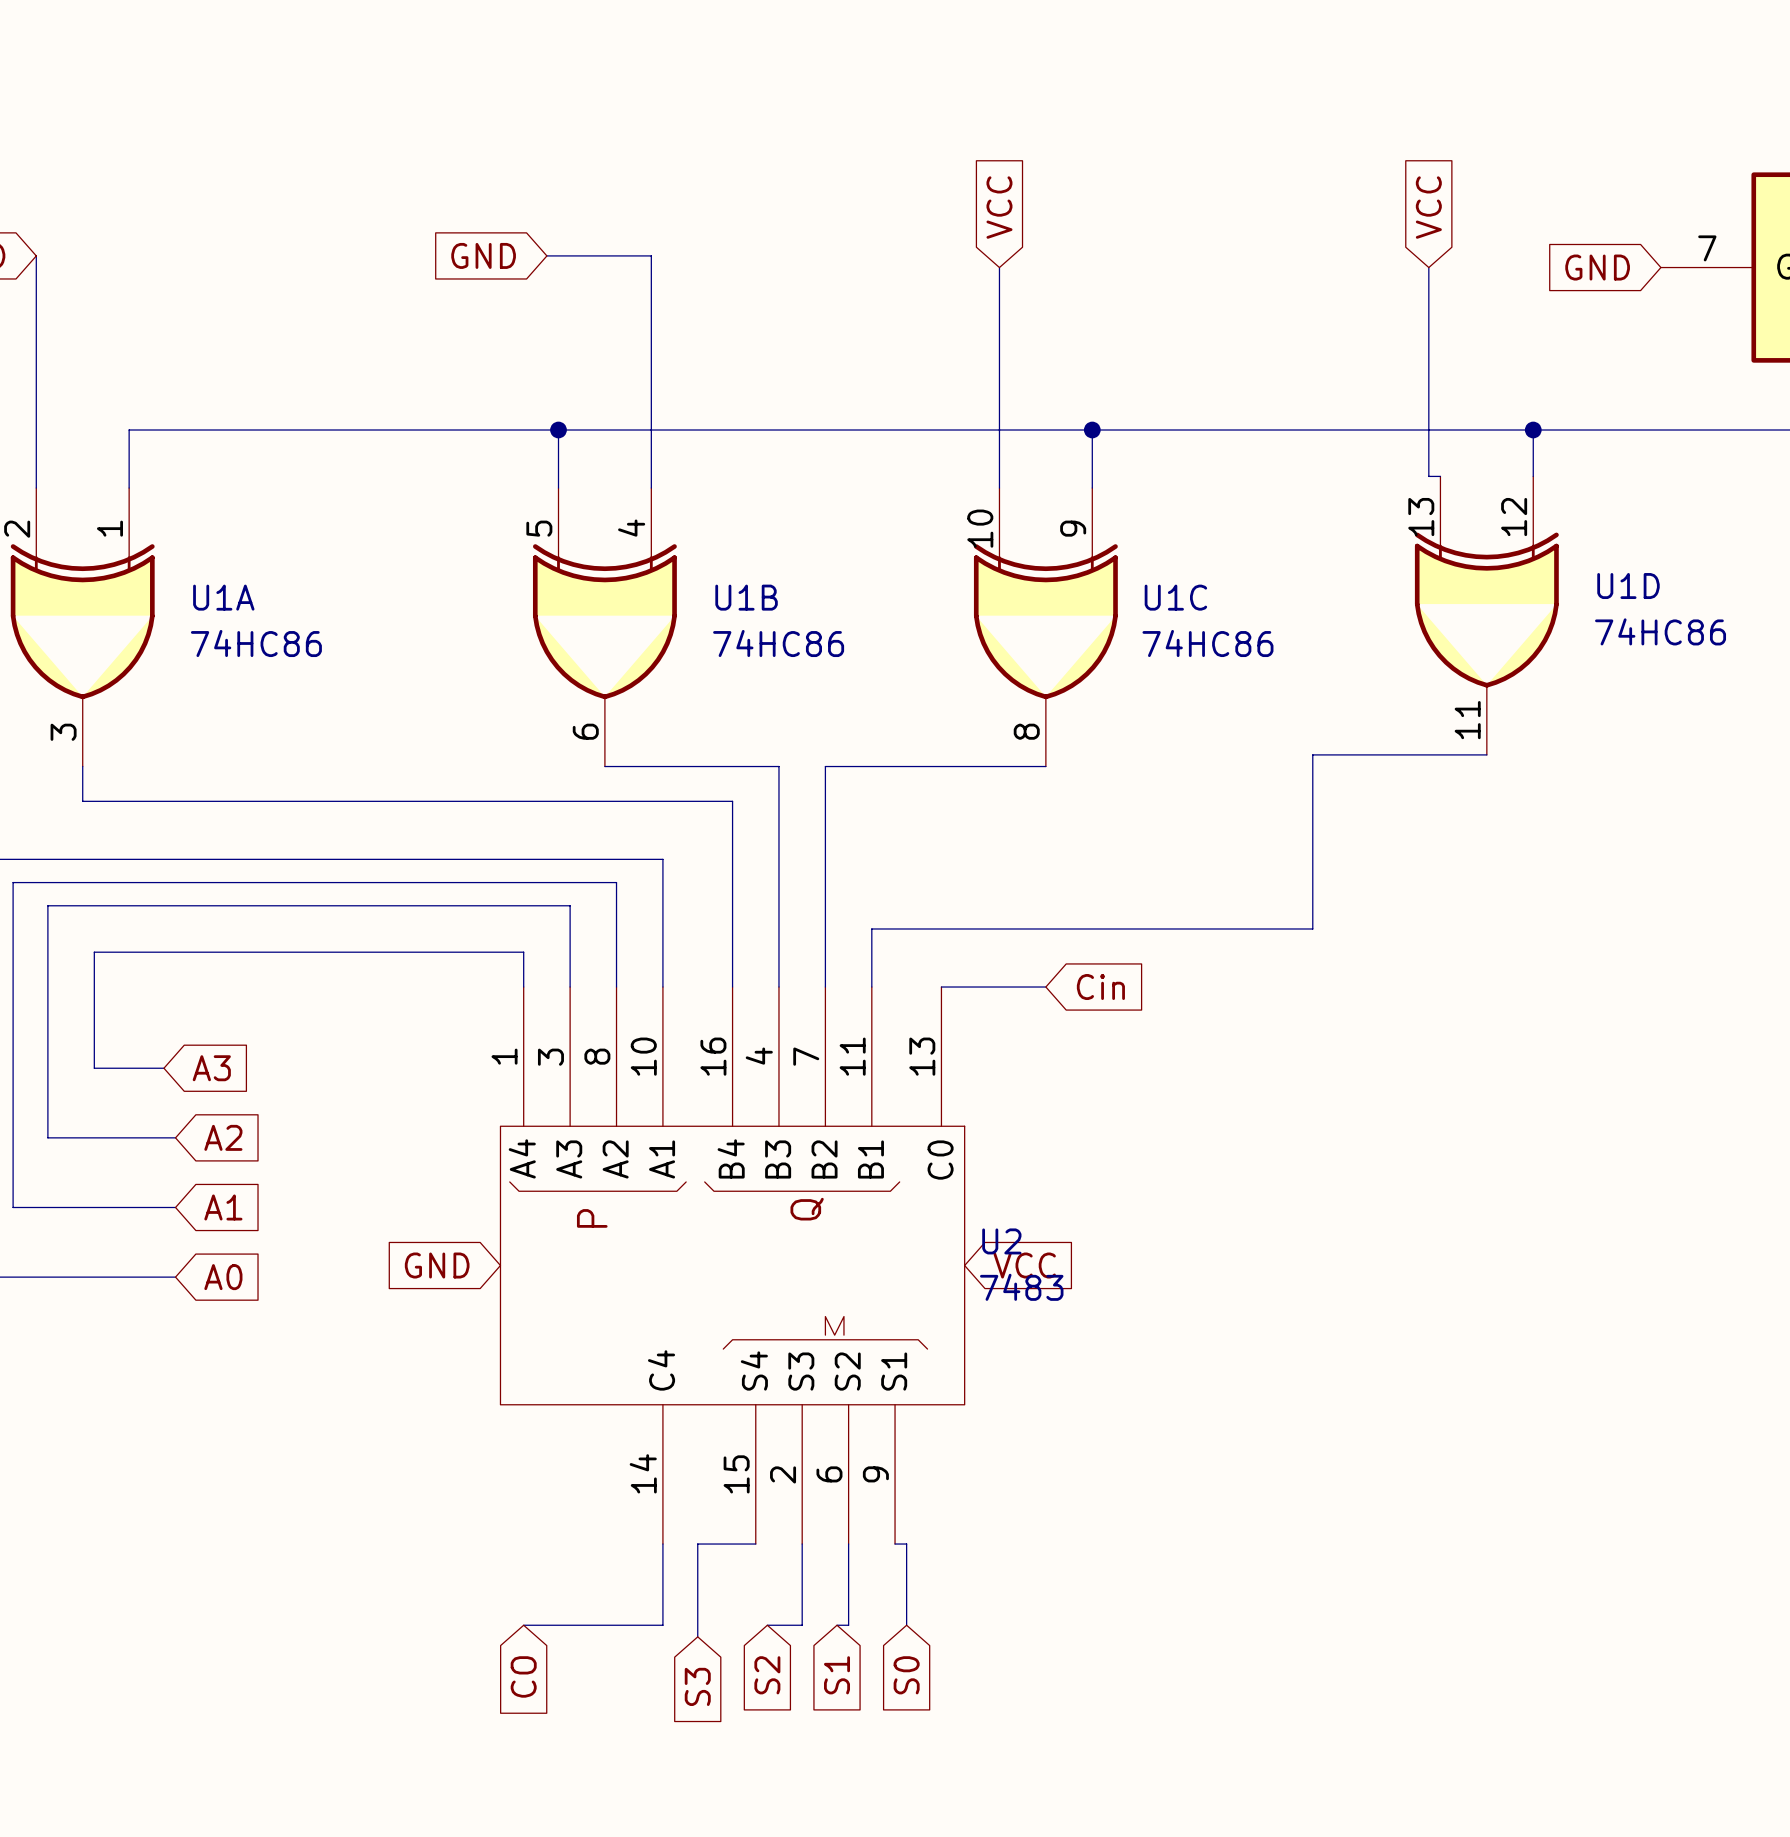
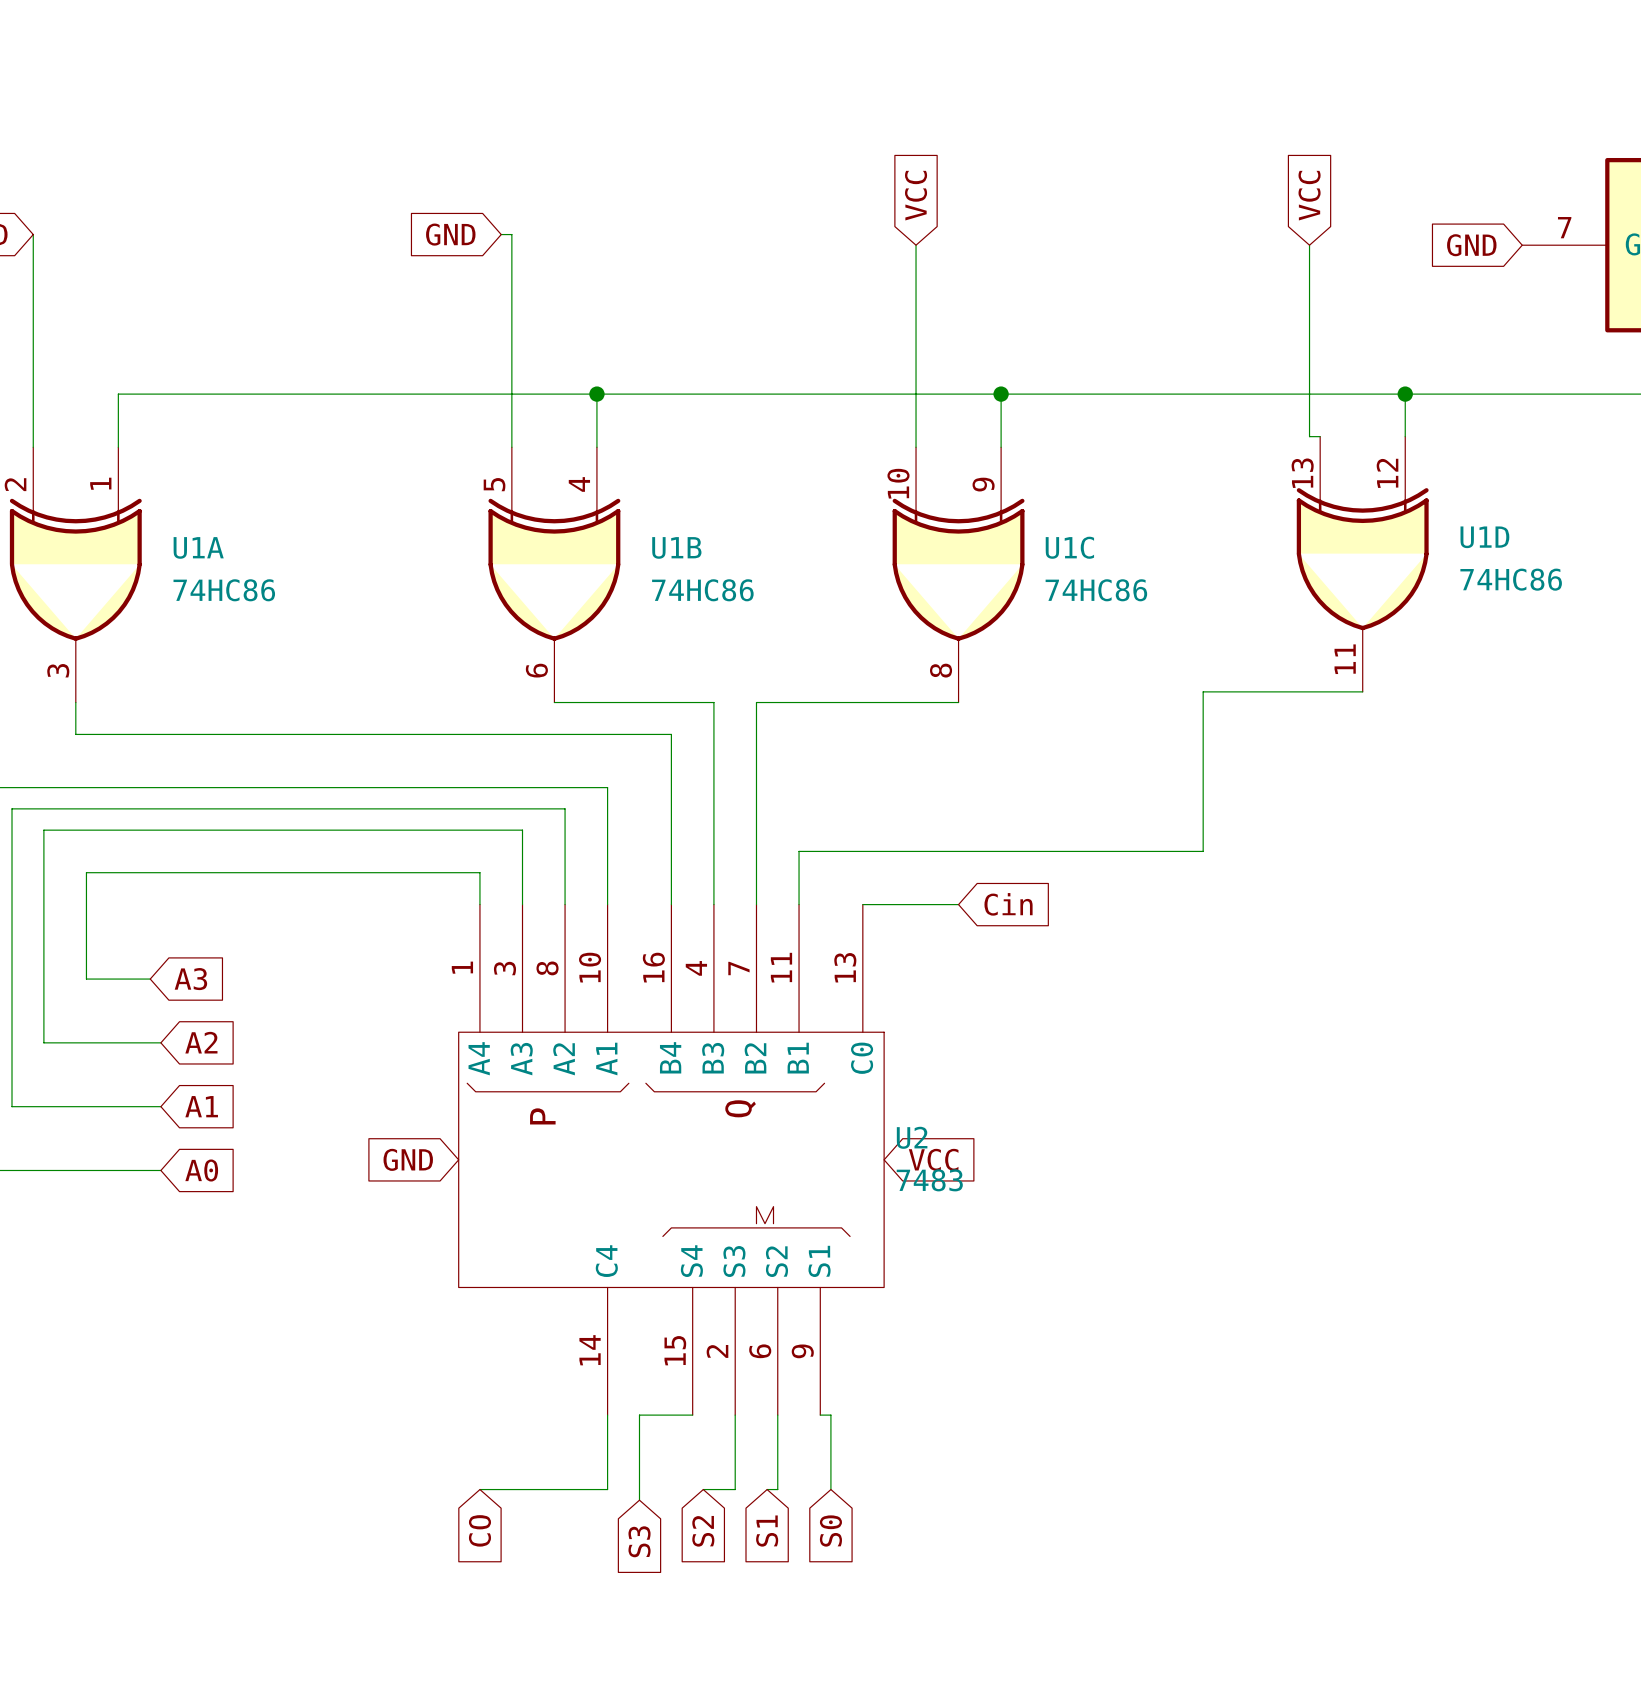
wire: (558, 255) (651, 255) (651, 430) -> (511, 234) (511, 394)
junction position: (558, 430) -> (596, 394)

